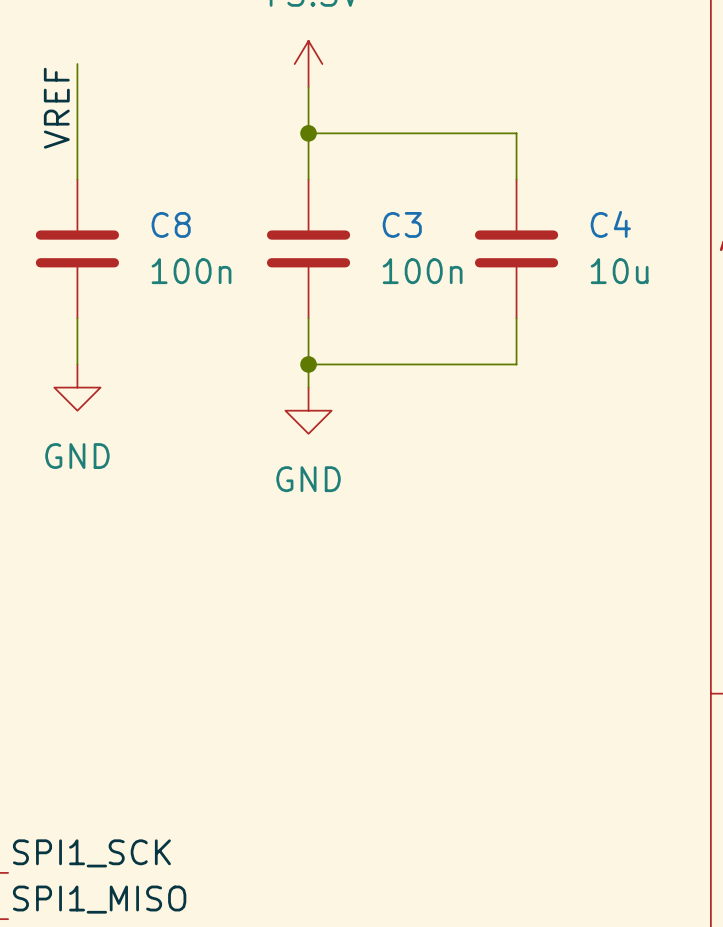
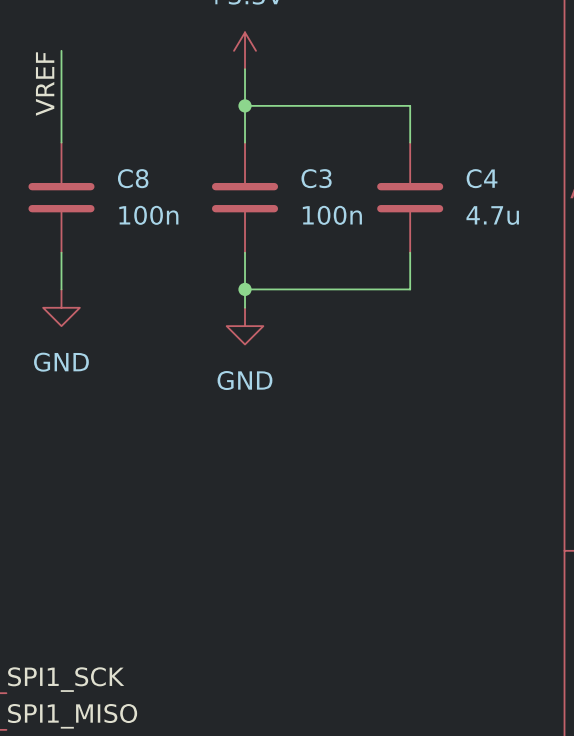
C4 value: 10u (619, 271) -> 4.7u (492, 215)

